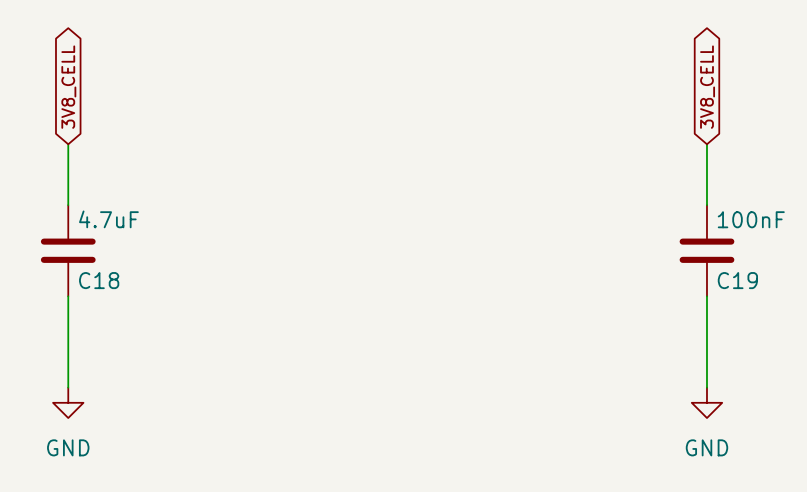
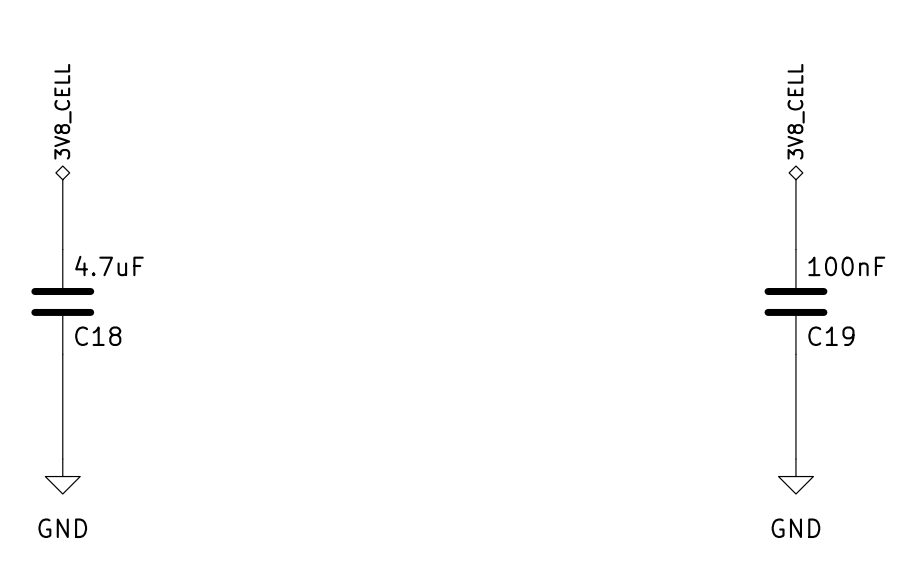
hierarchical label: none -> 3V8_CELL (62, 111)
hierarchical label: none -> 3V8_CELL (796, 111)
global label: 3V8_CELL (68, 87) -> none
global label: 3V8_CELL (707, 87) -> none

